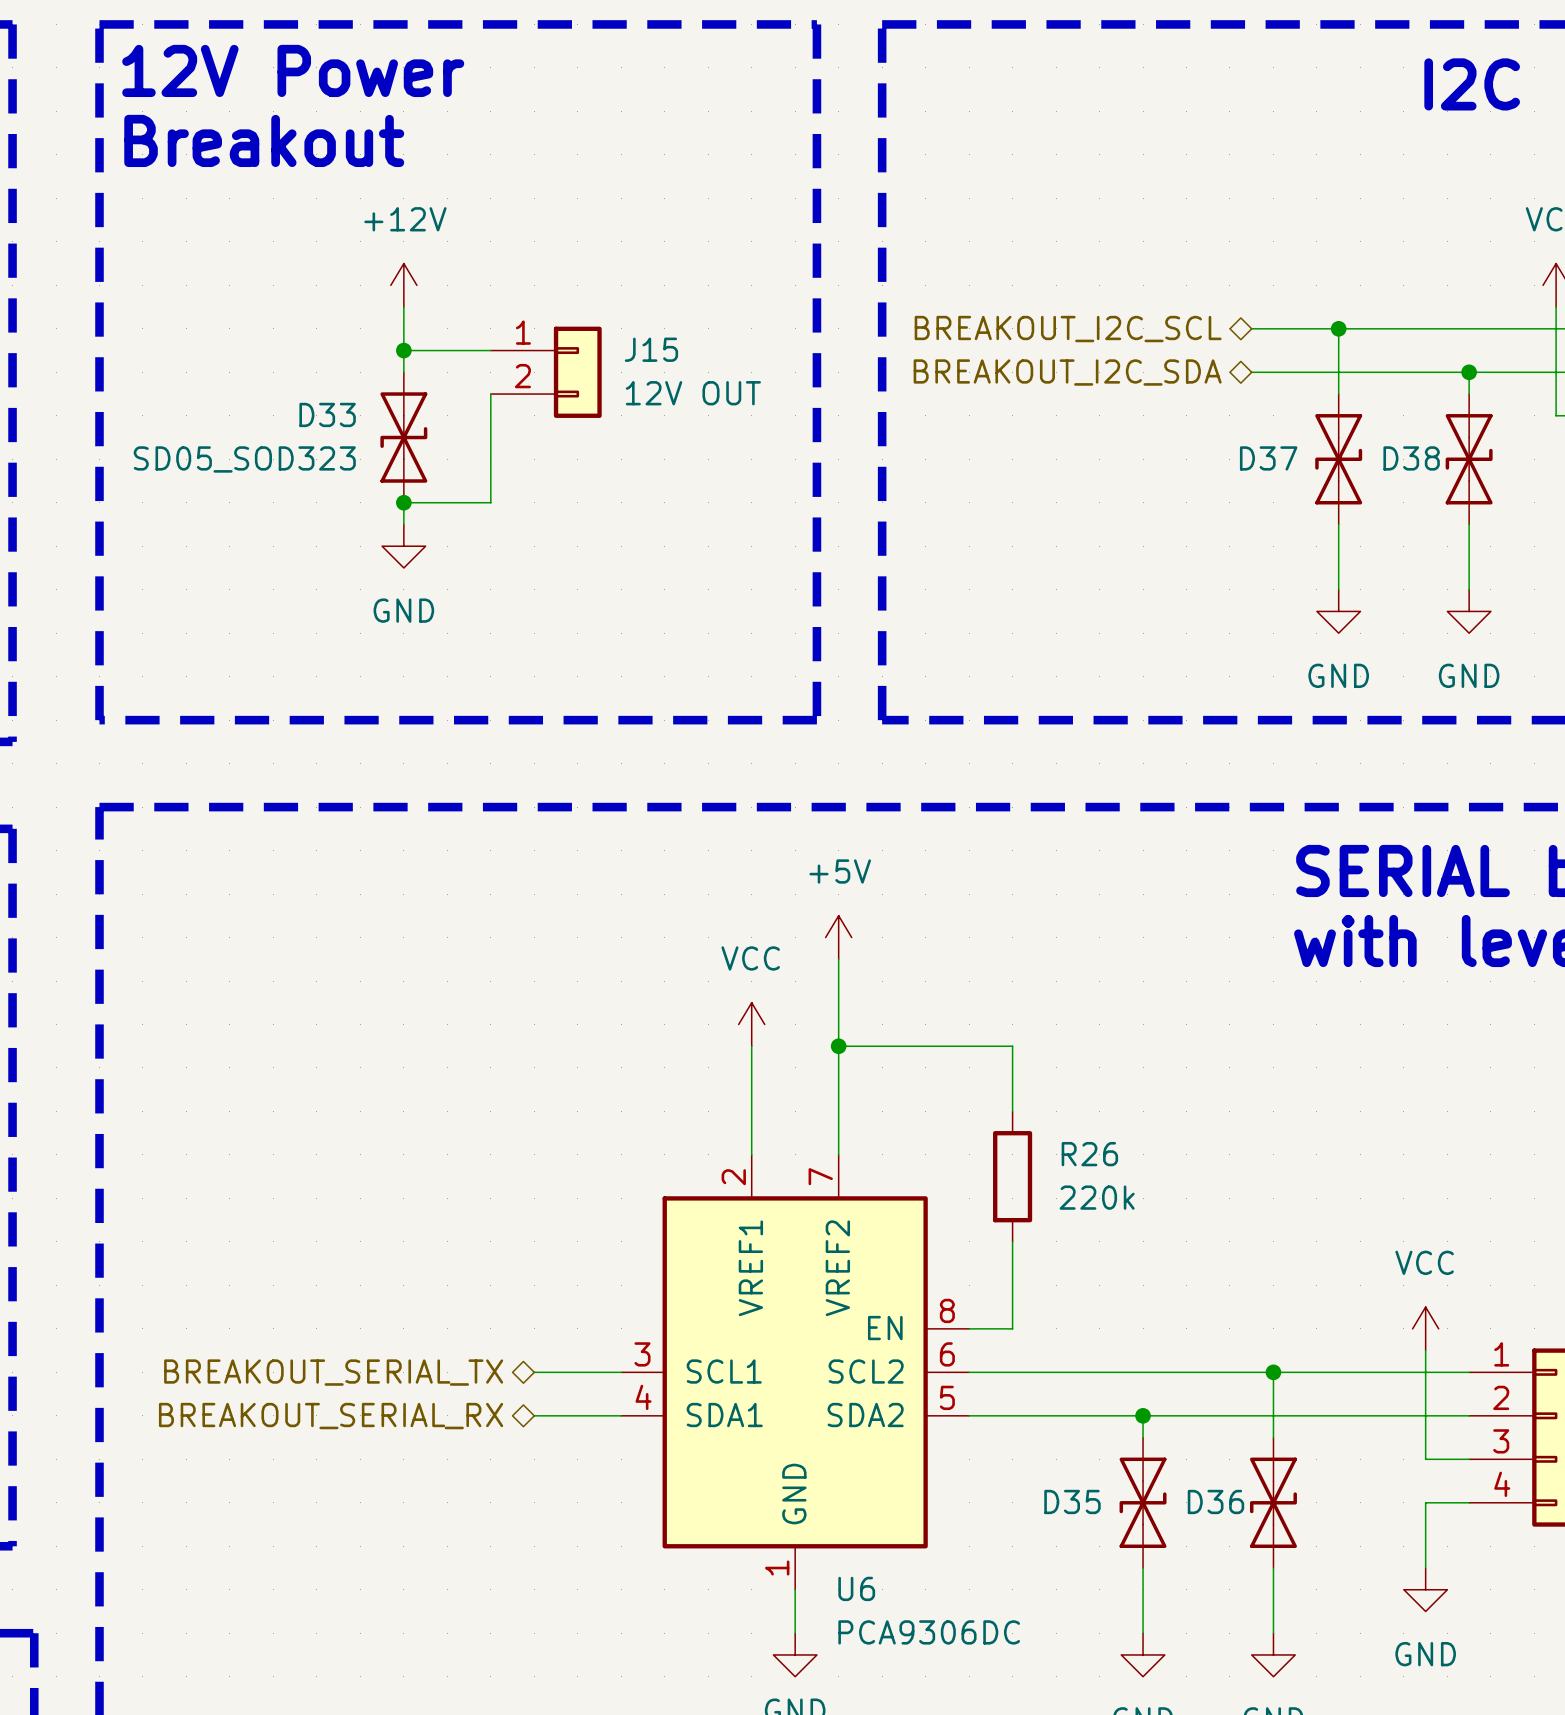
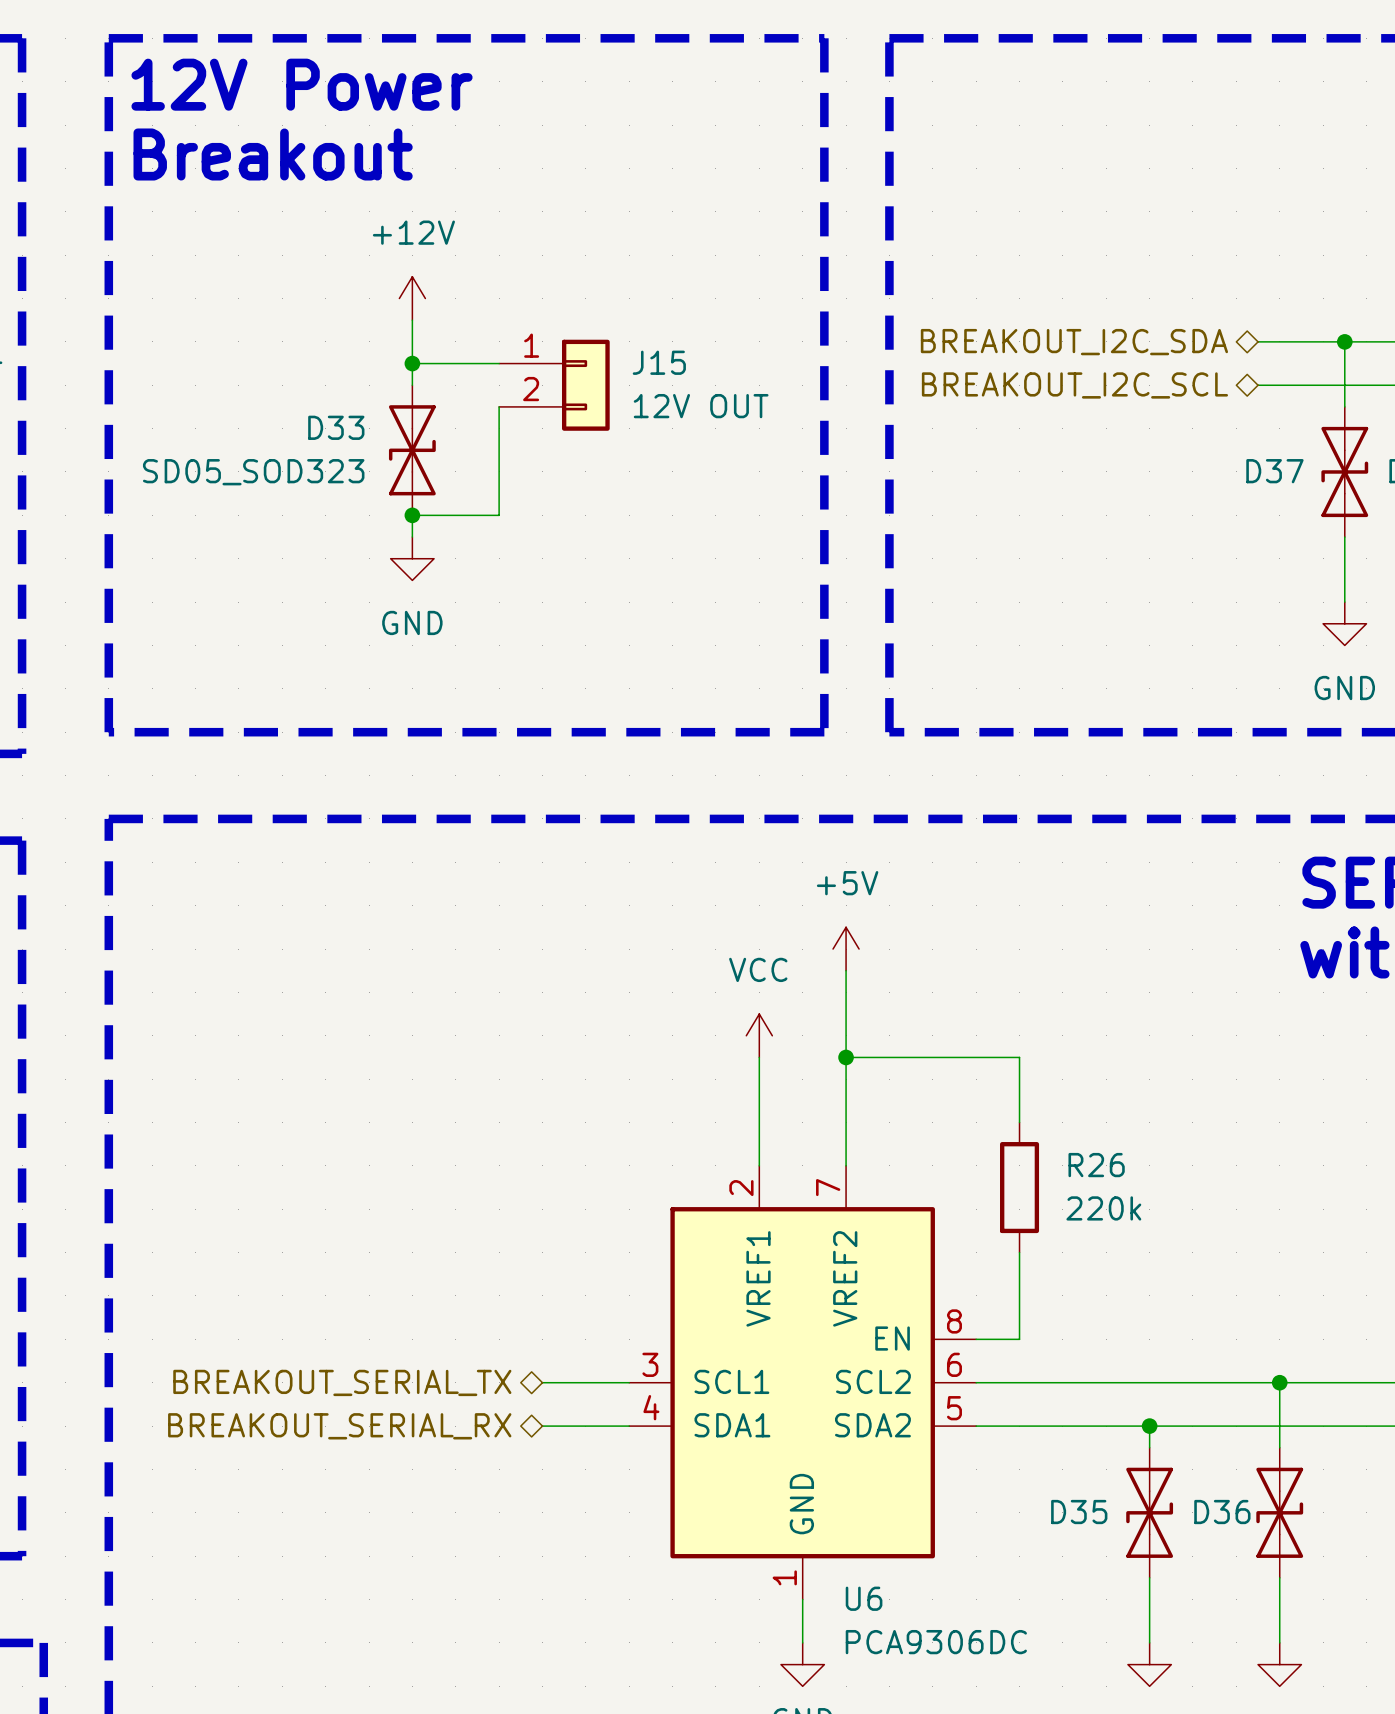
hierarchical label: BREAKOUT_I2C_SCL (1068, 329) -> BREAKOUT_I2C_SDA (1074, 342)
hierarchical label: BREAKOUT_I2C_SDA (1067, 372) -> BREAKOUT_I2C_SCL (1074, 385)

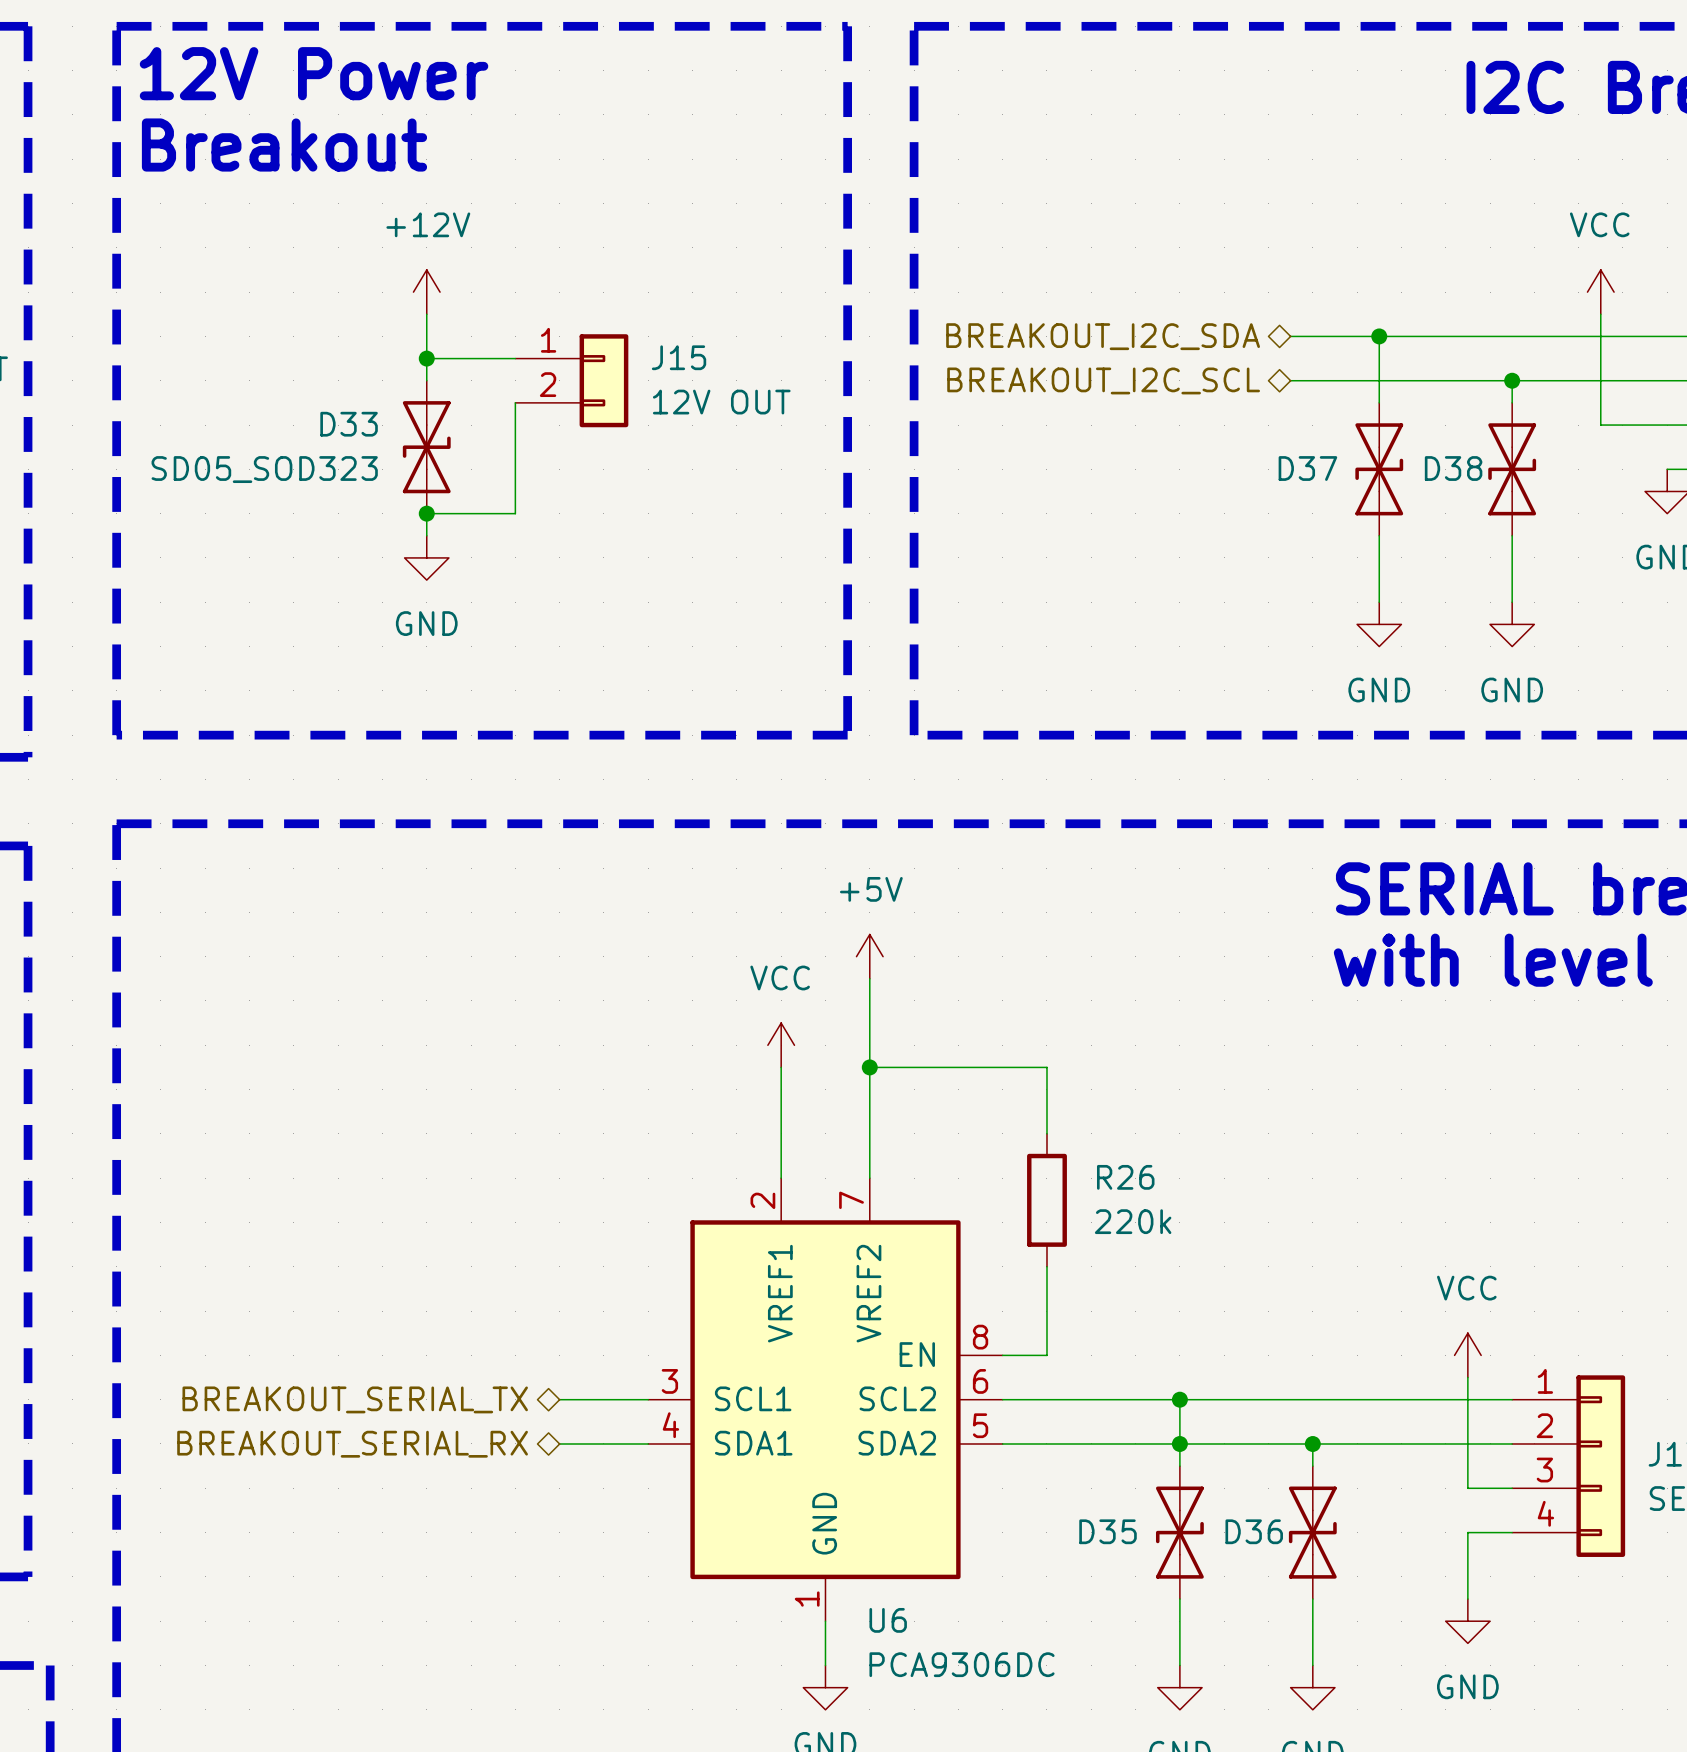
junction: none -> (1179, 1399)
wire: (1279, 1382) (1279, 1426) -> (1179, 1399) (1179, 1443)
junction position: (1279, 1382) -> (1312, 1443)

